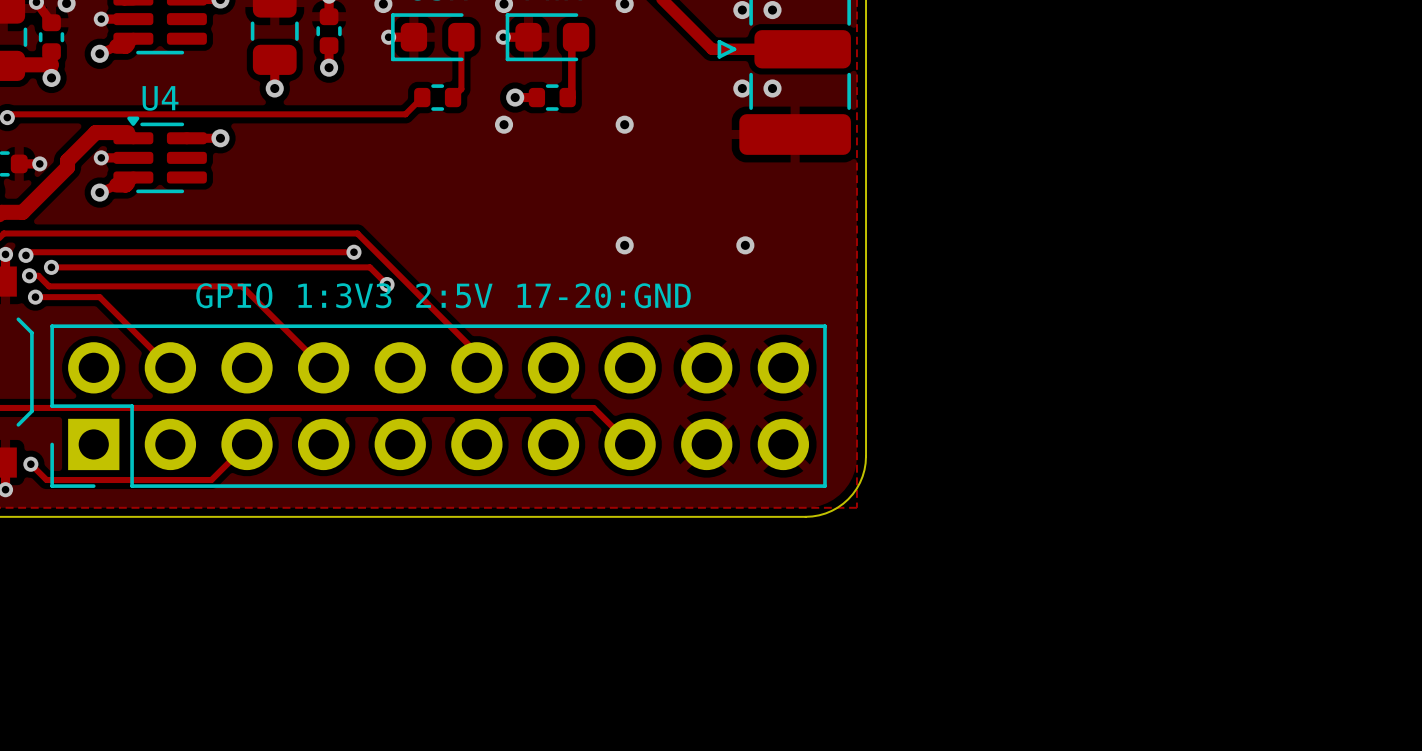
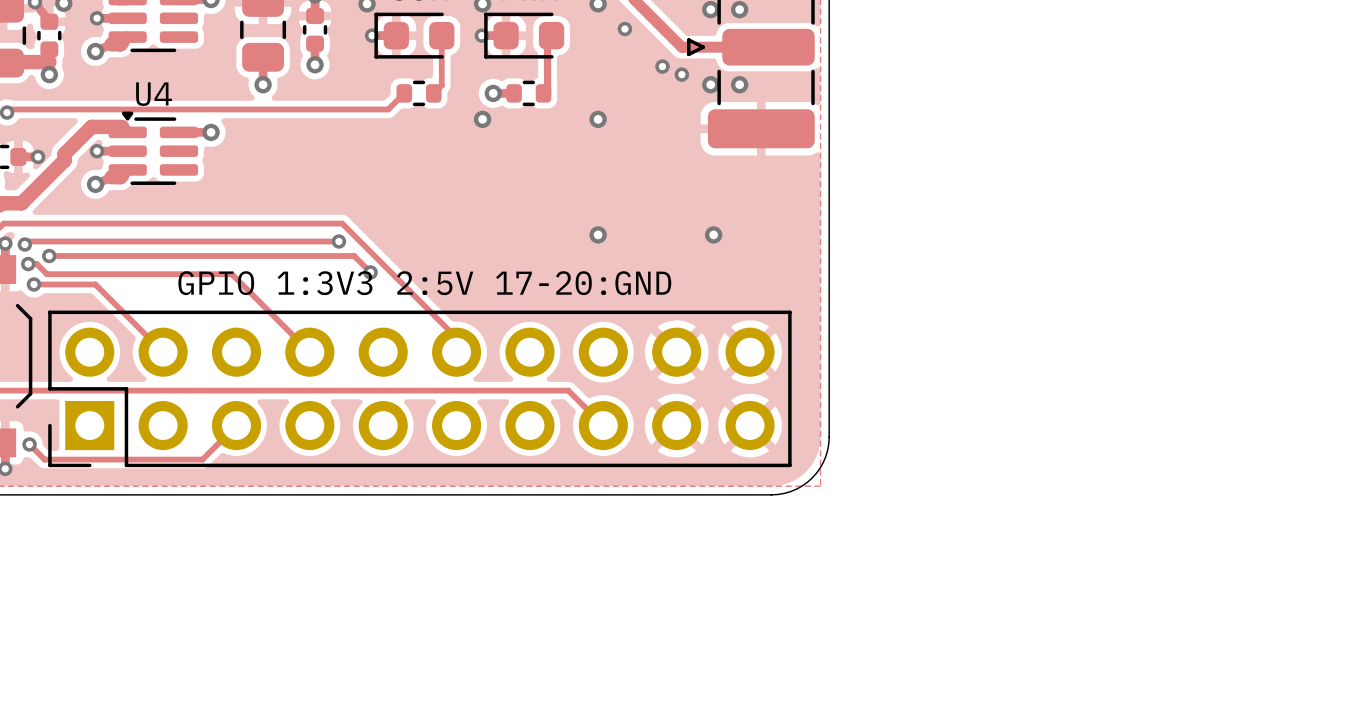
via: none -> (624, 29)
via: none -> (662, 66)
via: none -> (681, 74)

